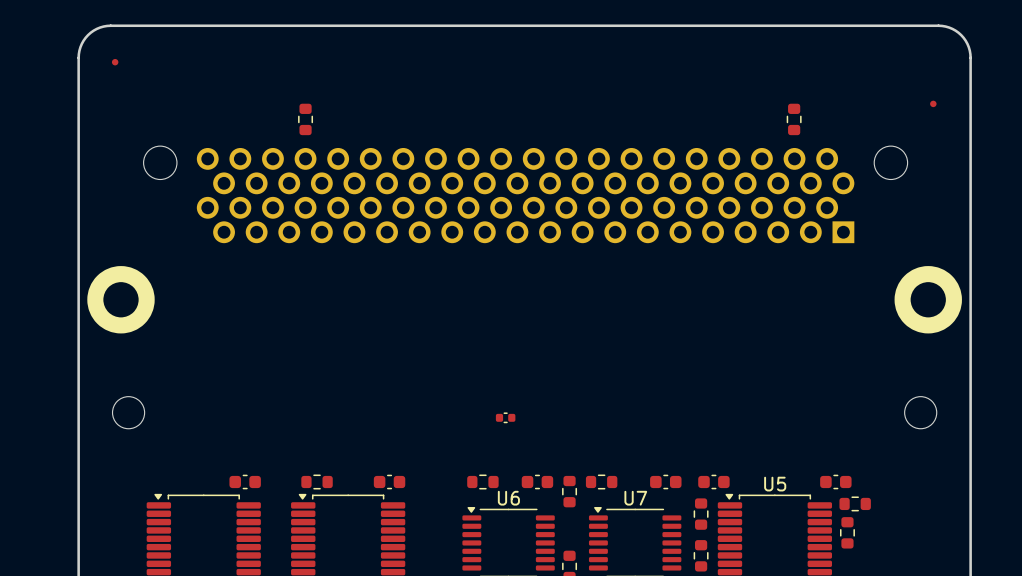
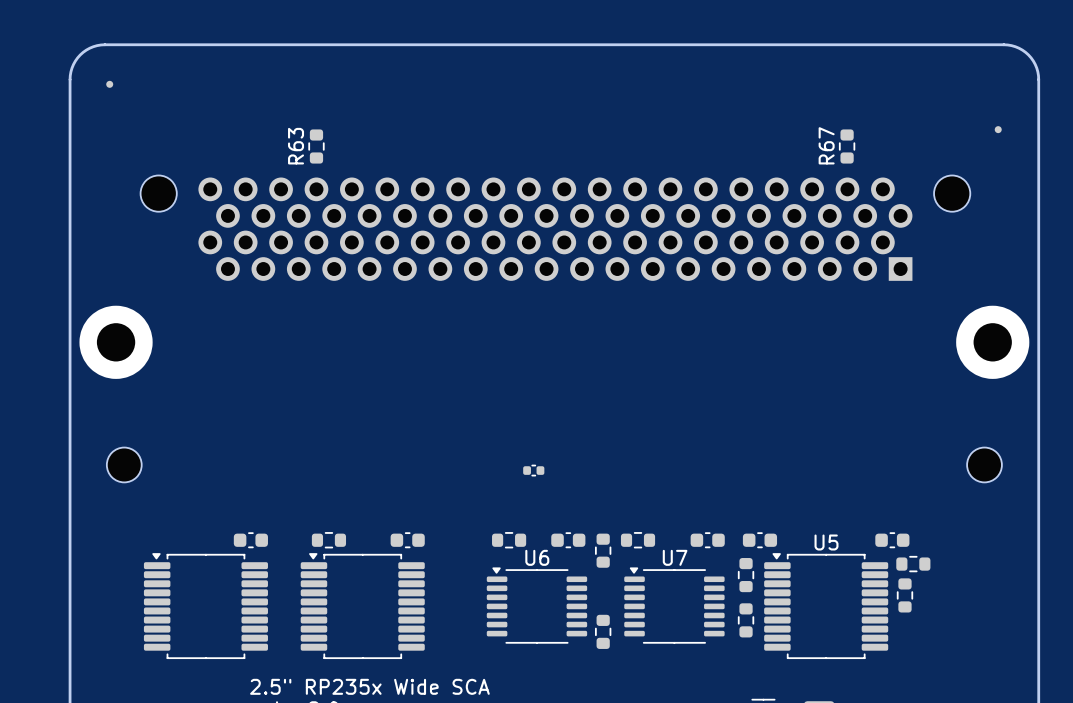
R67 name: none -> R67 (826, 145)
R63 name: none -> R63 (296, 146)

